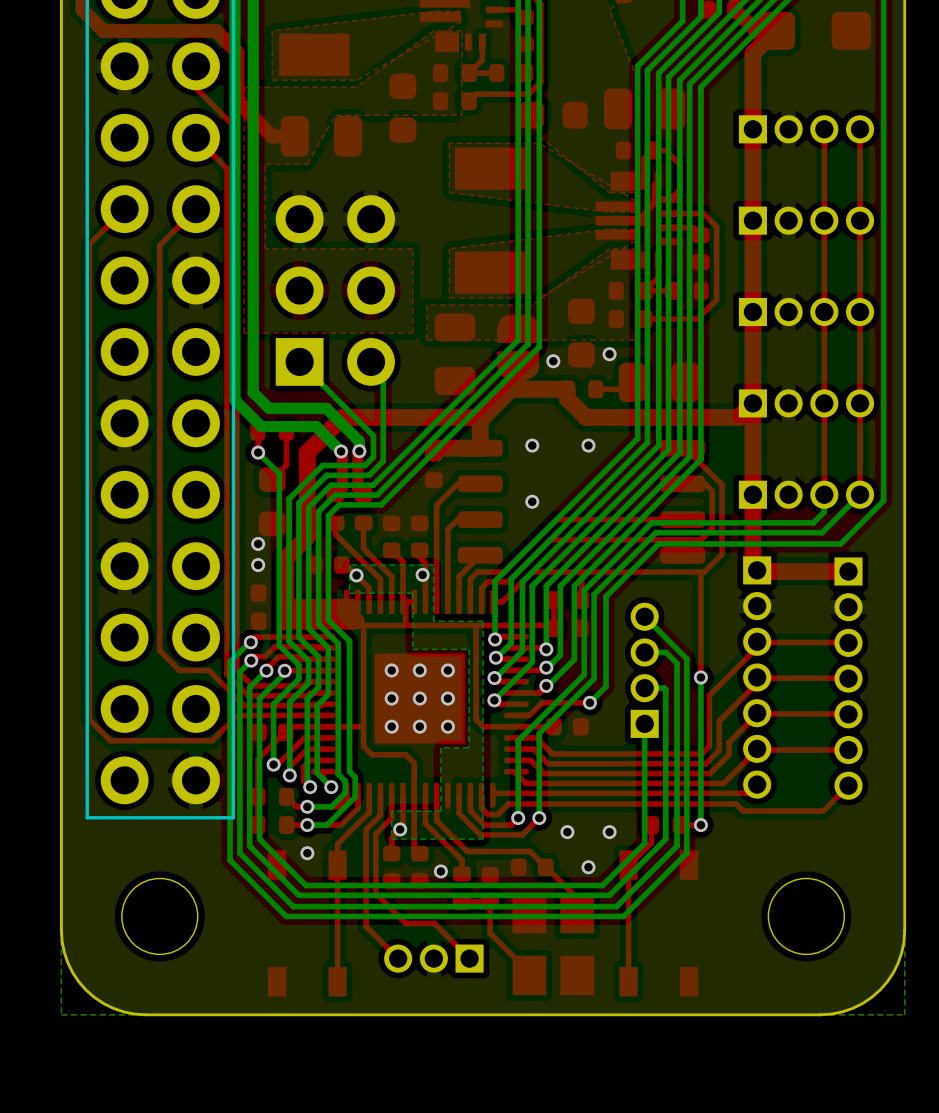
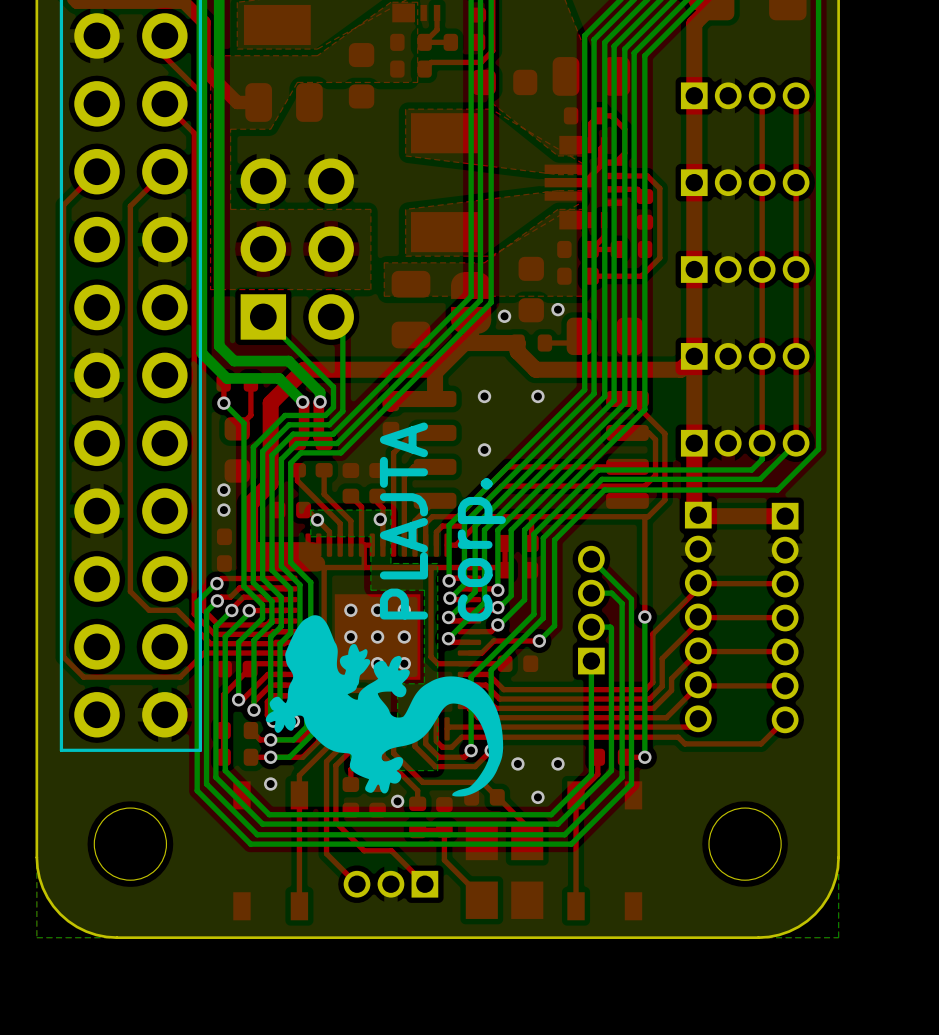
text: none -> PLAJTA (403, 521)
text: none -> corp. (481, 549)
drawing: none -> [265, 615, 504, 797]

